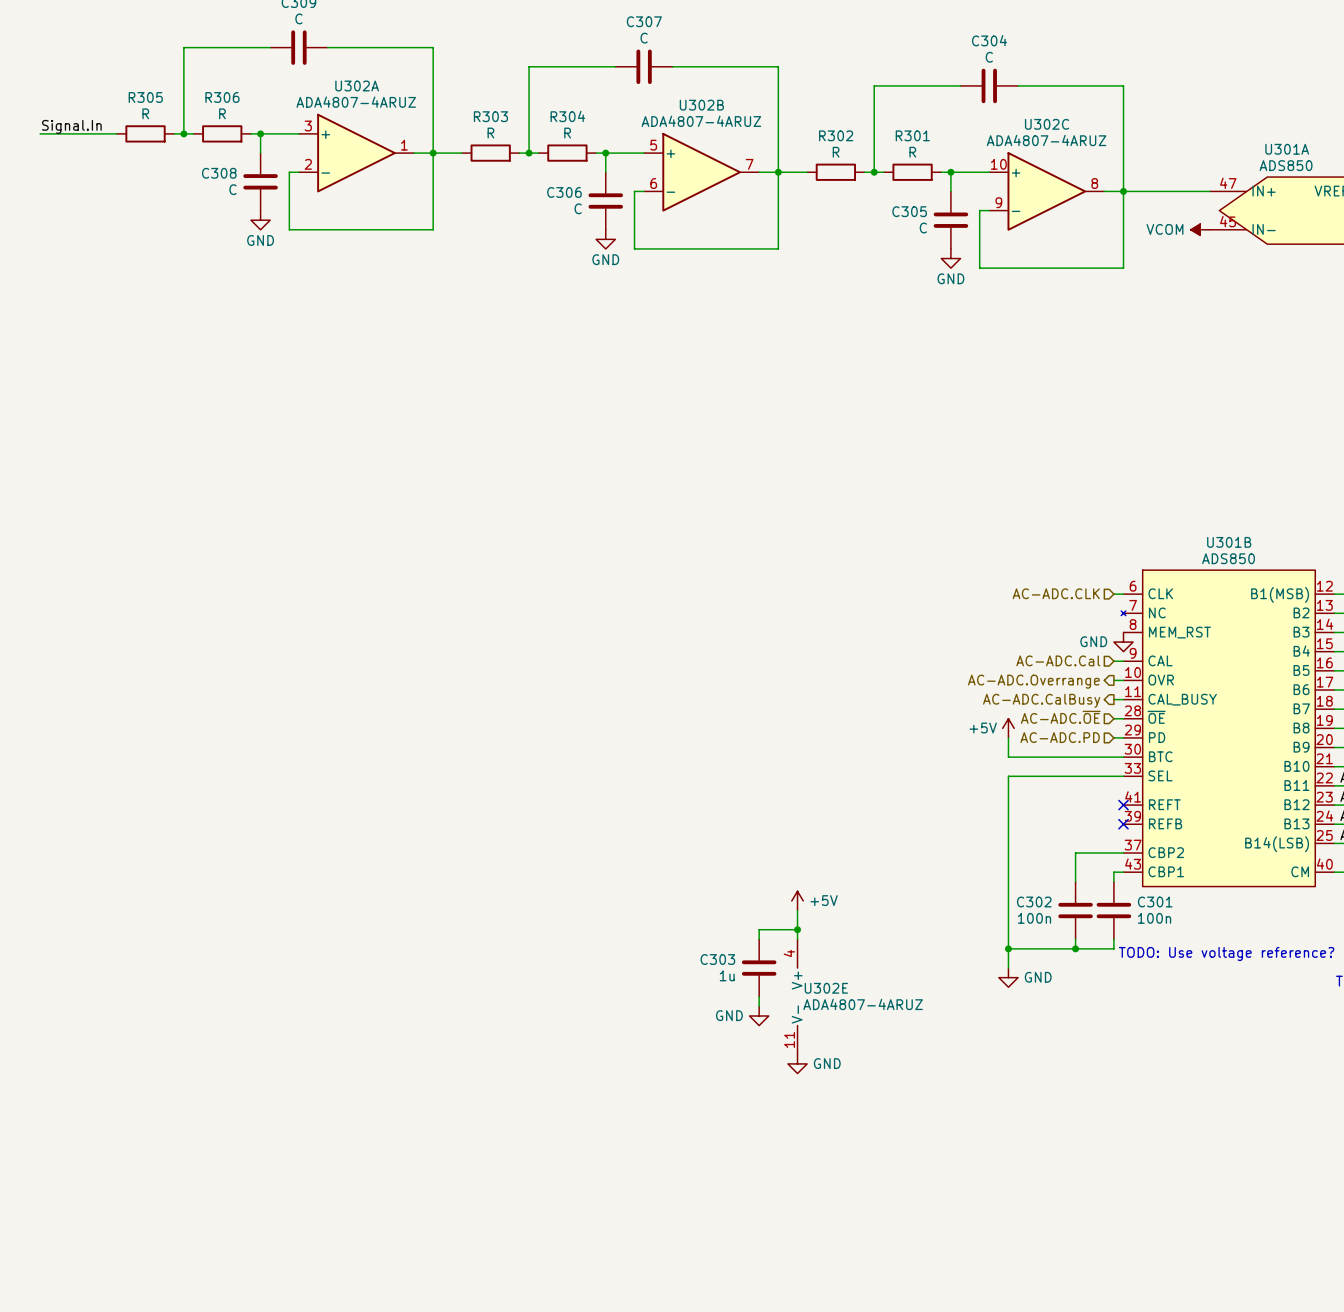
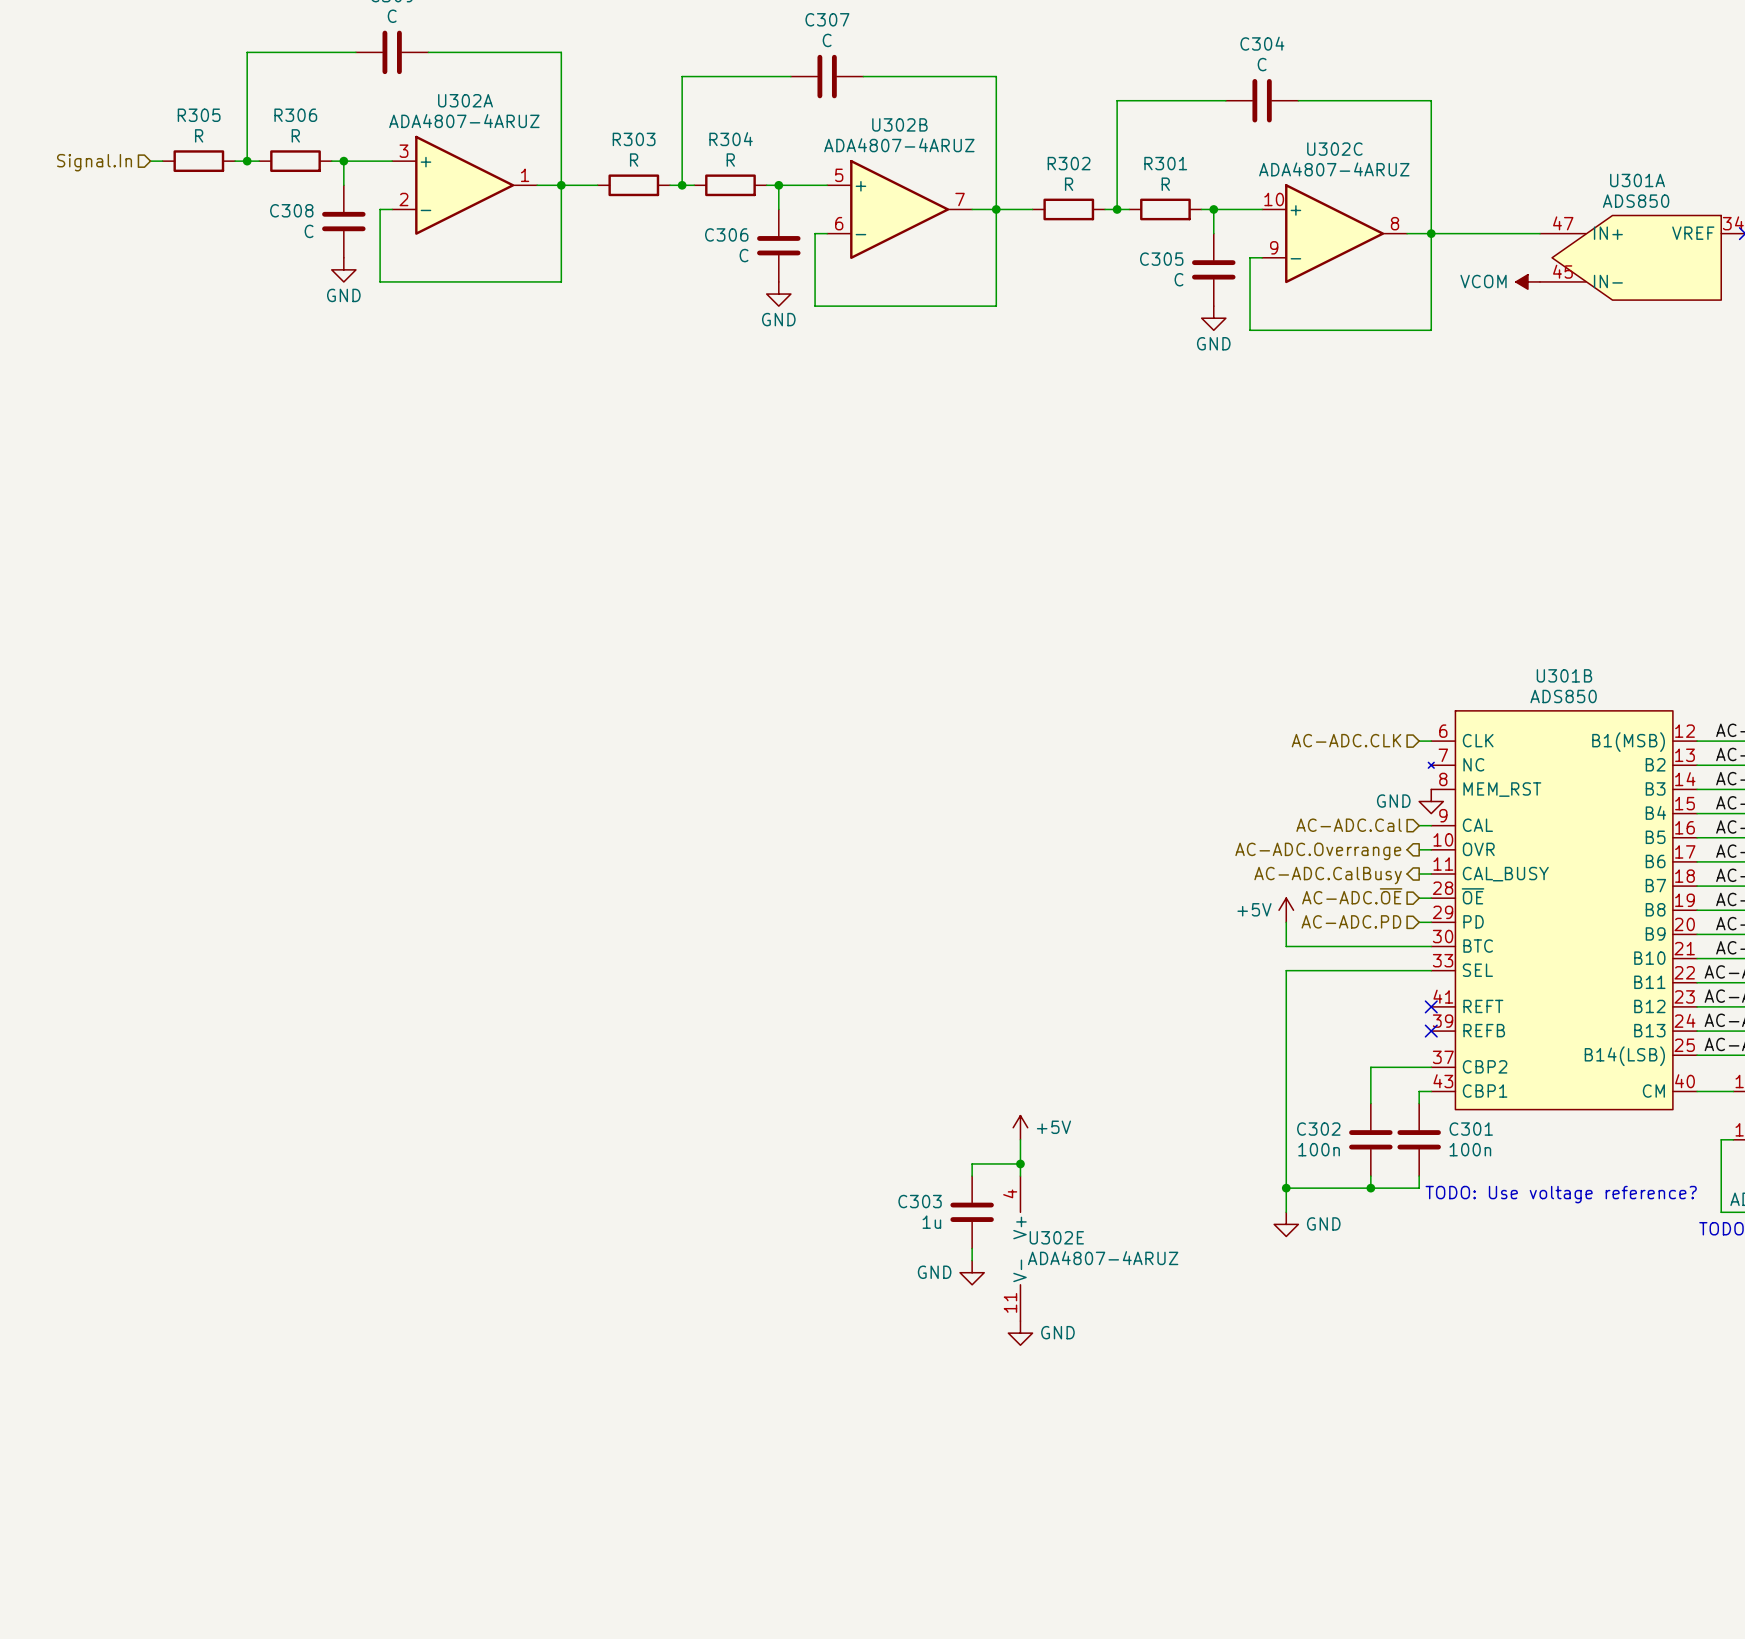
label: Signal.In (71, 126) -> none
wire: (40, 133) (107, 133) -> none
hierarchical label: none -> Signal.In (94, 162)

